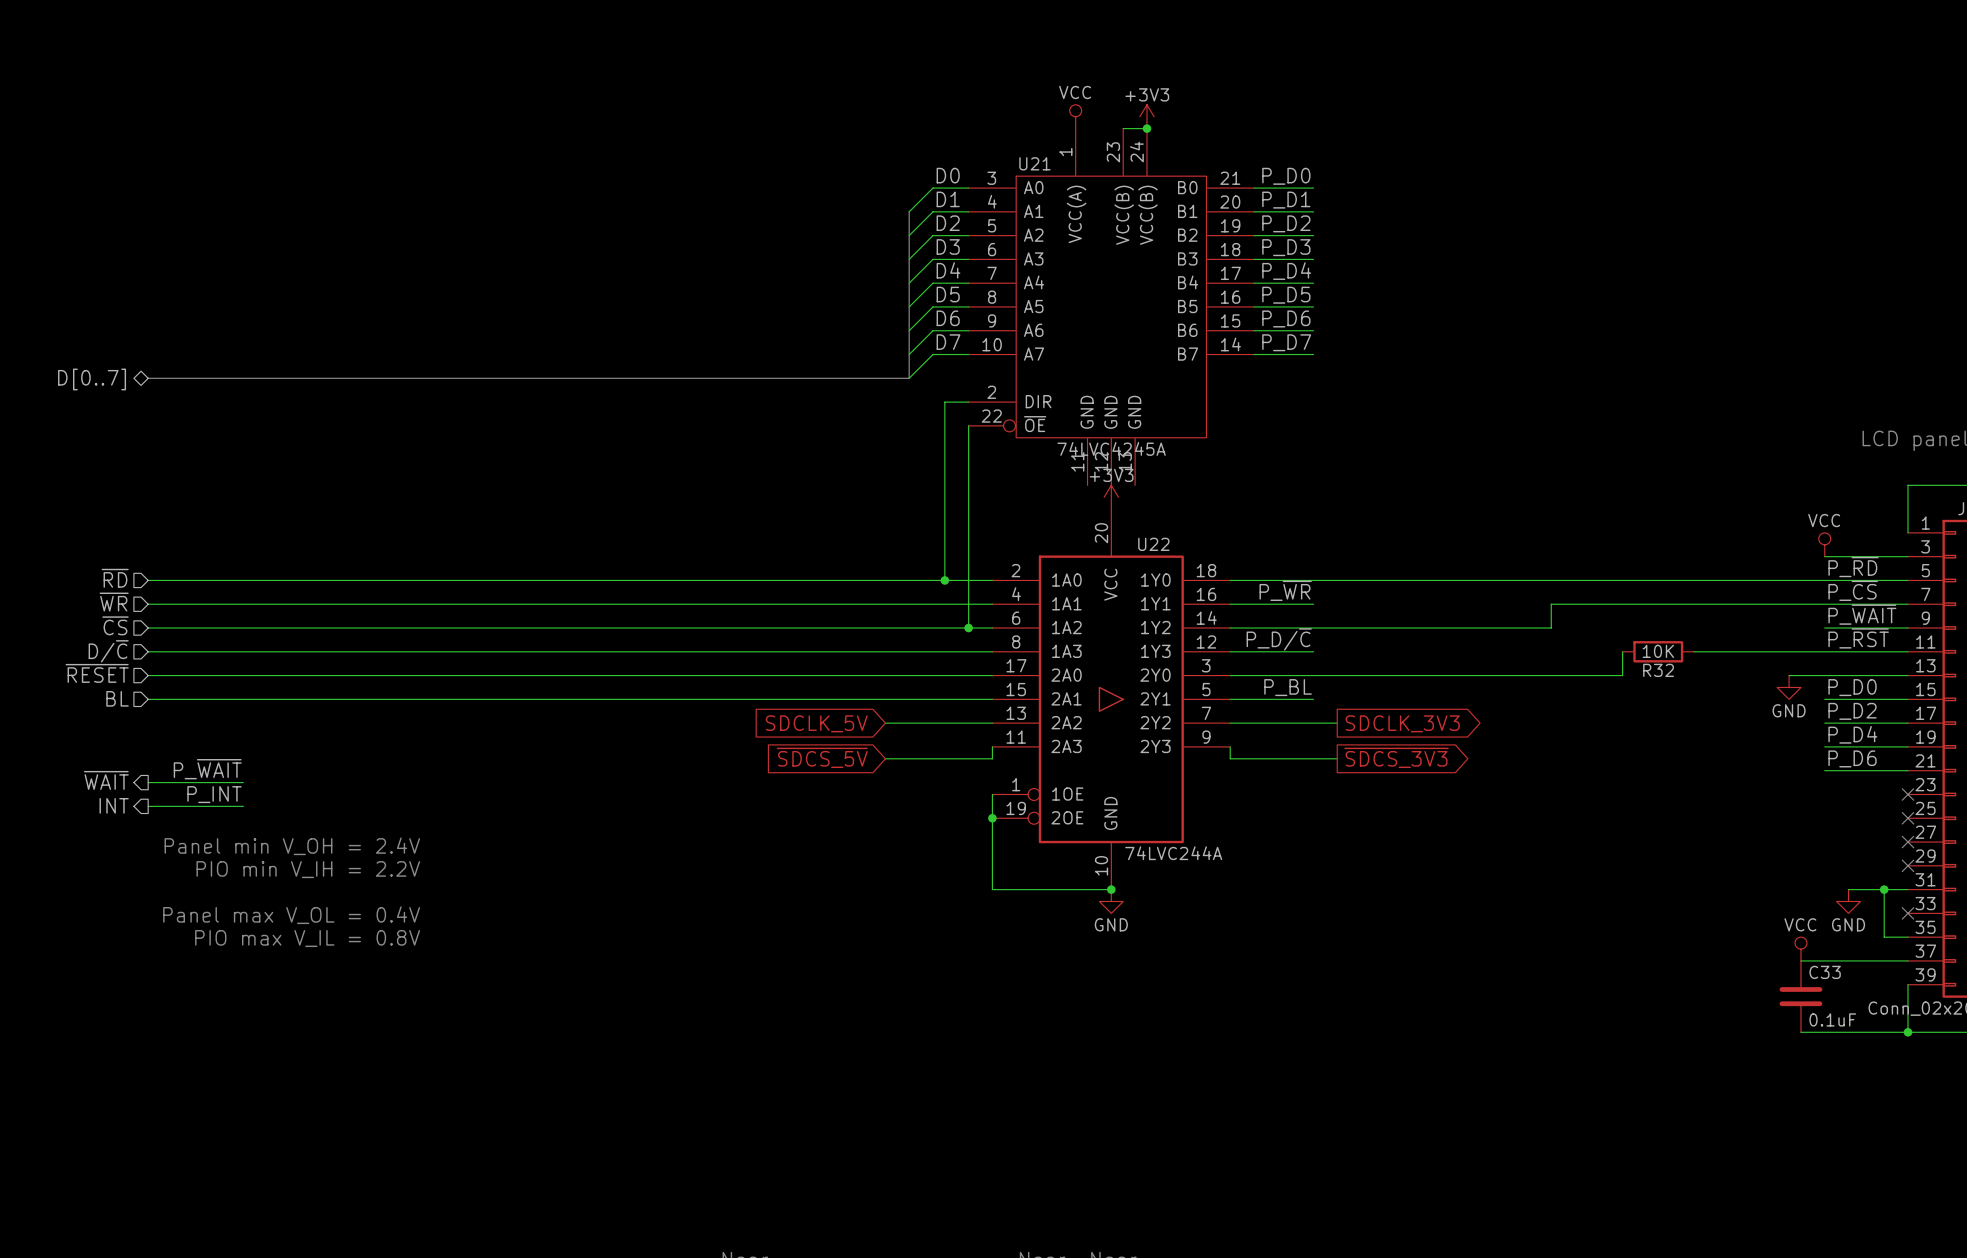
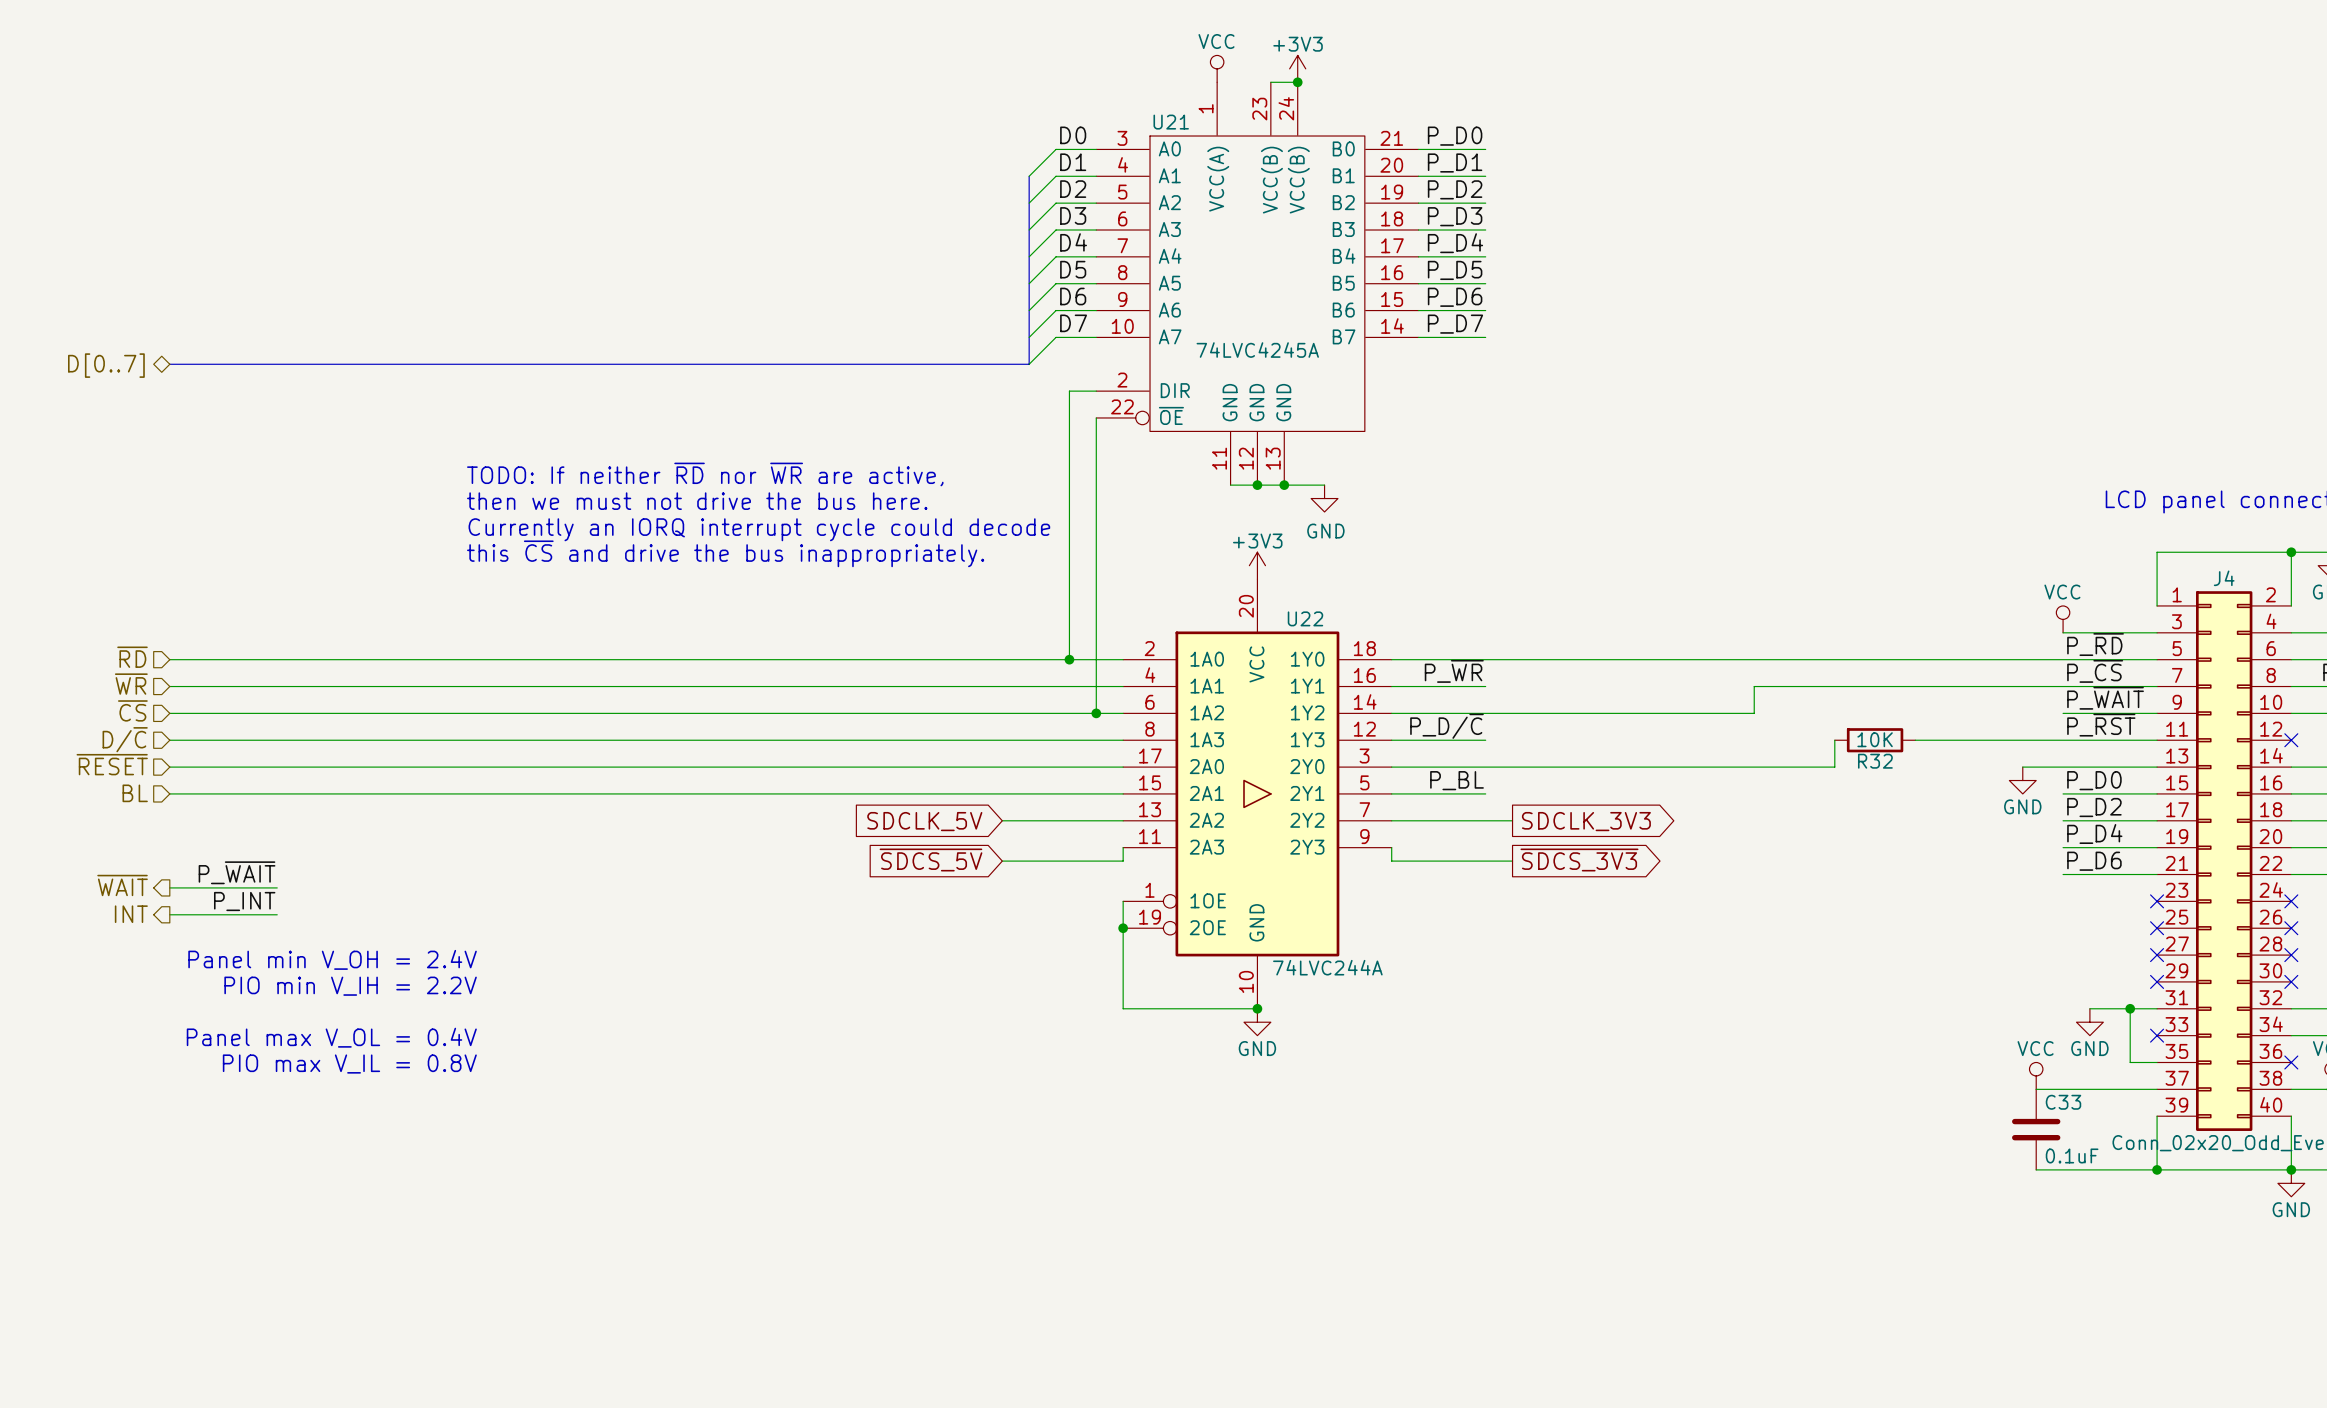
junction: none -> (1297, 82)
power symbol position: VCC (1075, 116) -> VCC (1217, 68)
power symbol position: +3V3 (1146, 116) -> +3V3 (1297, 68)
wire: (1123, 128) (1146, 128) -> (1270, 82) (1297, 82)
junction: (1146, 128) -> none
bus: none -> (1029, 176) (1029, 243)
label position: D0 (948, 175) -> D0 (1073, 135)
label position: P_D0 (1286, 176) -> P_D0 (1455, 136)
wire: (968, 188) (932, 188) (909, 211) -> (1096, 149) (1056, 149) (1029, 176)
wire: (1254, 188) (1313, 188) -> (1418, 149) (1485, 149)
label position: D1 (948, 199) -> D1 (1073, 162)
label position: P_D1 (1286, 200) -> P_D1 (1455, 163)
wire: (968, 211) (932, 211) (909, 235) -> (1096, 176) (1056, 176) (1029, 203)
wire: (1254, 211) (1313, 211) -> (1418, 176) (1485, 176)
label position: D2 (948, 223) -> D2 (1073, 189)
label position: P_D2 (1286, 223) -> P_D2 (1455, 189)
wire: (968, 235) (932, 235) (909, 259) -> (1096, 203) (1056, 203) (1029, 230)
wire: (1254, 235) (1313, 235) -> (1418, 203) (1485, 203)
label position: D3 (948, 246) -> D3 (1073, 215)
label position: P_D3 (1286, 247) -> P_D3 (1455, 216)
wire: (968, 259) (932, 259) (909, 283) -> (1096, 230) (1056, 230) (1029, 256)
wire: (1254, 259) (1313, 259) -> (1418, 230) (1485, 230)
label position: D4 (948, 270) -> D4 (1073, 242)
label position: P_D4 (1286, 271) -> P_D4 (1455, 243)
wire: (968, 283) (932, 283) (909, 306) -> (1096, 256) (1056, 256) (1029, 283)
wire: (1254, 283) (1313, 283) -> (1418, 256) (1485, 256)
label position: D5 (948, 294) -> D5 (1073, 269)
label position: P_D5 (1286, 295) -> P_D5 (1455, 270)
wire: (968, 306) (932, 306) (909, 330) -> (1096, 283) (1056, 283) (1029, 310)
U21 position: (1111, 306) -> (1257, 283)
wire: (1254, 306) (1313, 306) -> (1418, 283) (1485, 283)
bus: (909, 318) (909, 378) (148, 378) -> (1029, 364) (169, 364)
label position: D6 (948, 318) -> D6 (1073, 296)
label position: P_D6 (1286, 318) -> P_D6 (1455, 297)
wire: (968, 330) (932, 330) (909, 354) -> (1096, 310) (1056, 310) (1029, 337)
wire: (1254, 330) (1313, 330) -> (1418, 310) (1485, 310)
label position: D7 (948, 342) -> D7 (1073, 323)
label position: P_D7 (1286, 342) -> P_D7 (1455, 324)
wire: (968, 354) (932, 354) (909, 378) -> (1096, 337) (1056, 337) (1029, 364)
wire: (1254, 354) (1313, 354) -> (1418, 337) (1485, 337)
wire: none -> (1096, 417) (1096, 485)
hierarchical label position: D[0..7] (92, 379) -> D[0..7] (106, 365)
wire: (944, 402) (968, 402) -> (1069, 458) (1069, 391) (1096, 391)
text: none -> TODO: If neither ~{RD} nor ~{WR} are active, (705, 474)
wire: none -> (1230, 485) (1324, 485)
junction: none -> (1257, 485)
junction: none -> (1284, 485)
power symbol: none -> GND (1324, 498)
text: none -> then we must not drive the bus here. (697, 501)
U21 value position: 74LVC4245A (1111, 448) -> 74LVC4245A (1257, 350)
text: none -> Currently an IORQ interrupt cycle could decode (759, 529)
text: none -> this ~{CS} and drive the bus inappropriately. (725, 553)

